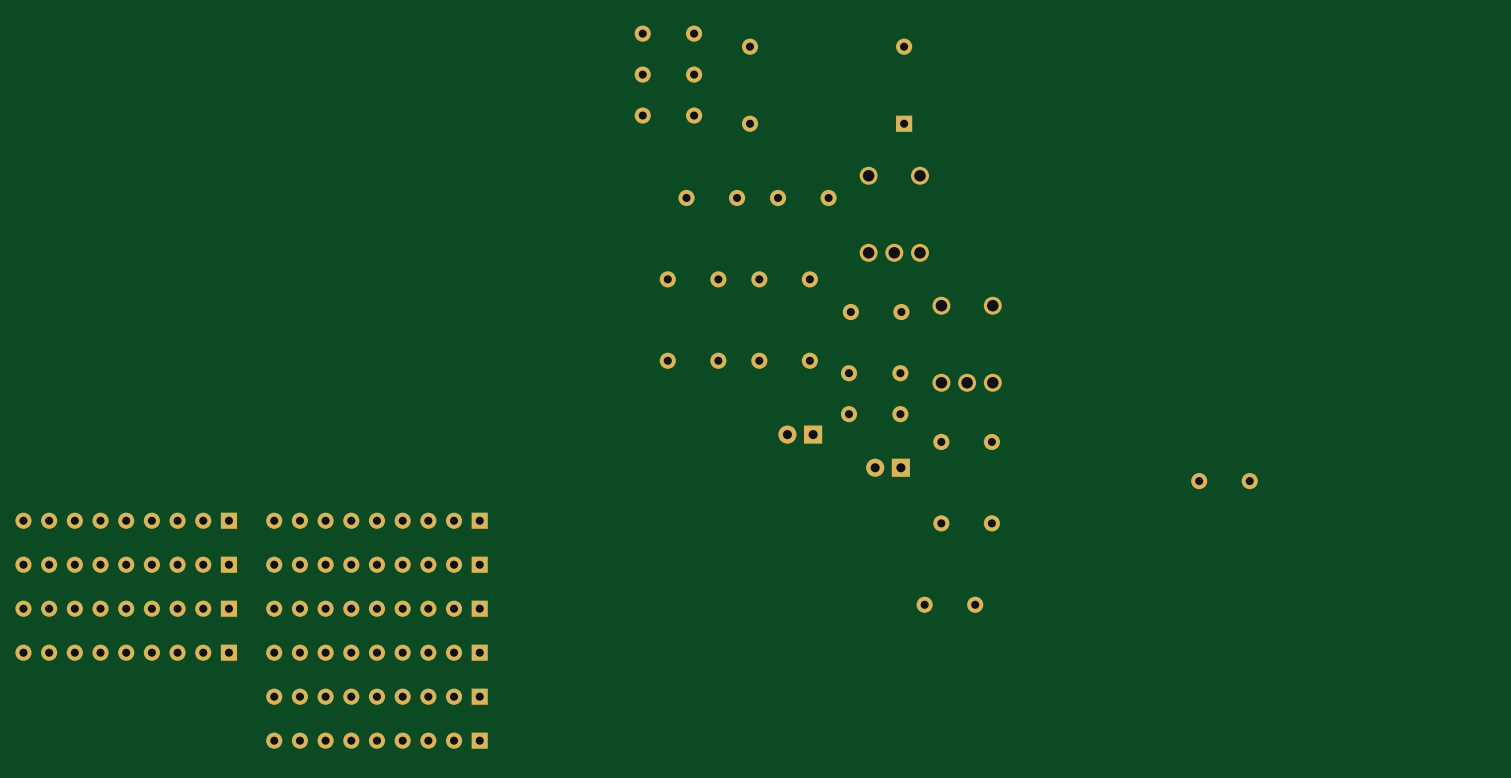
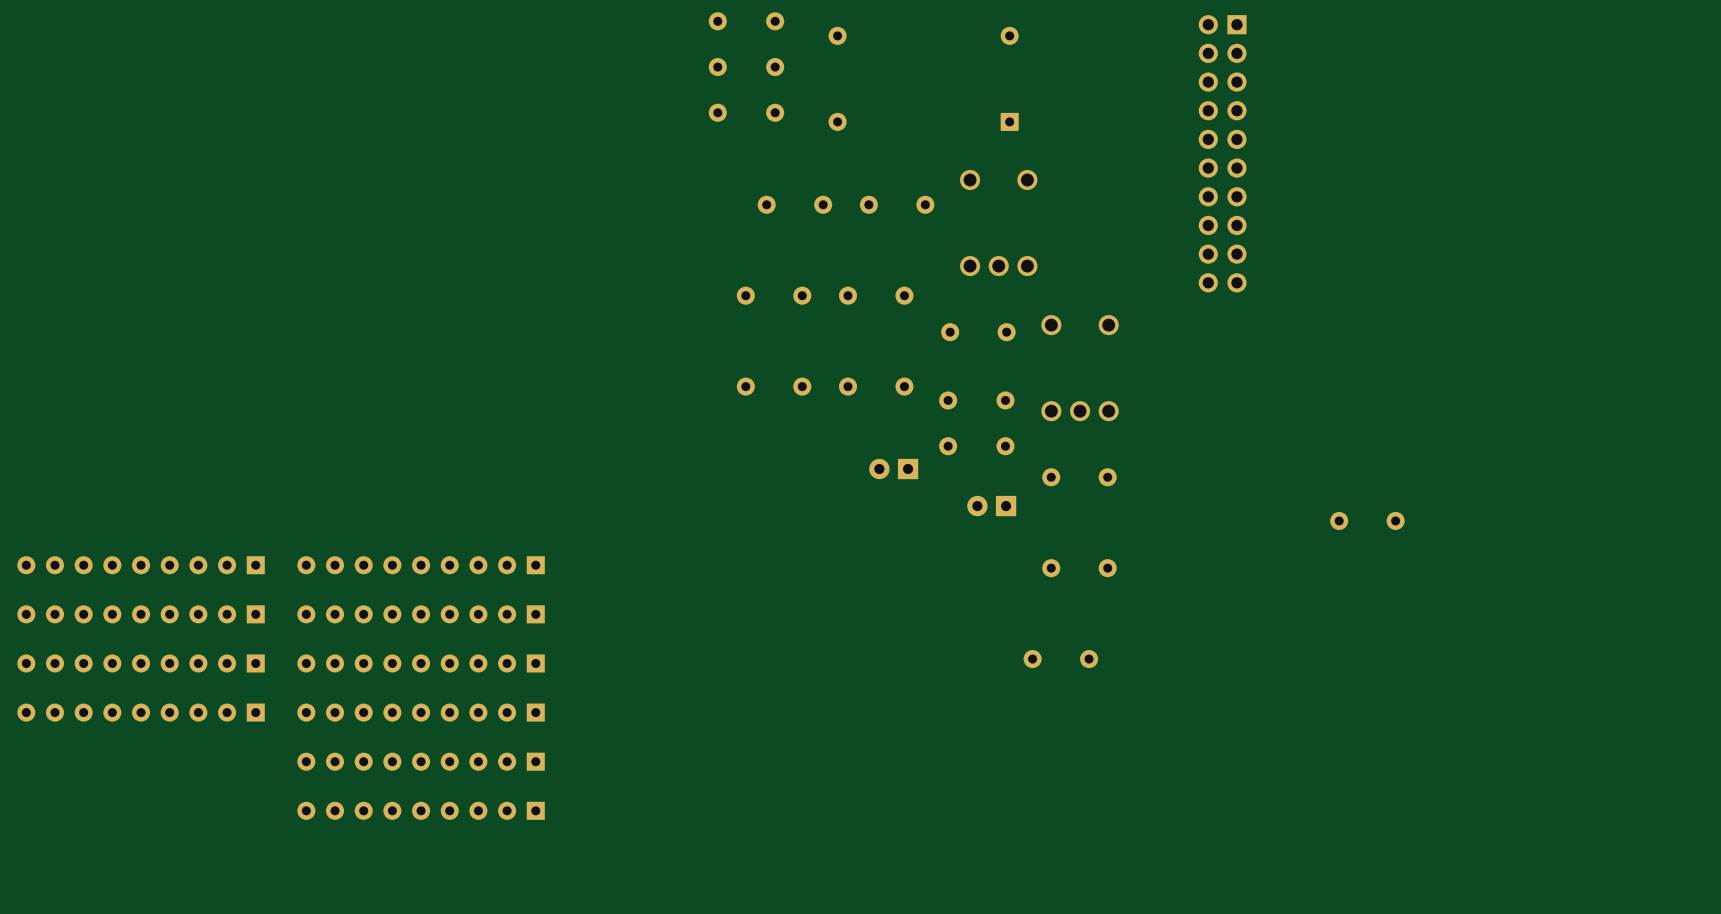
part: none -> (1222, 153)

